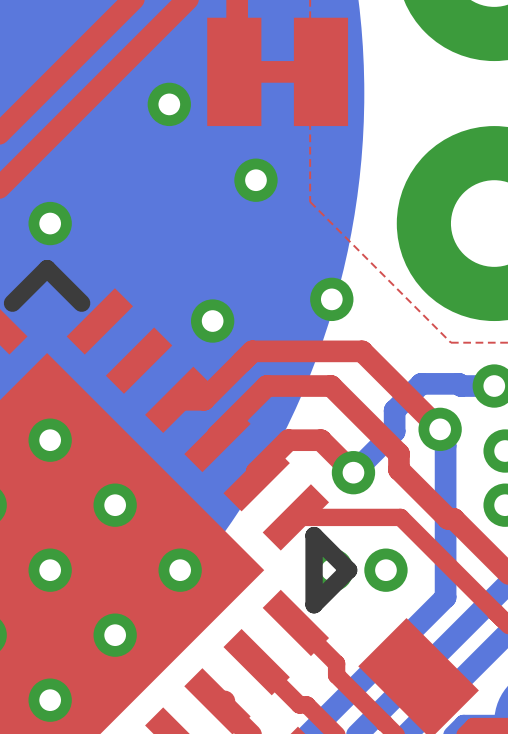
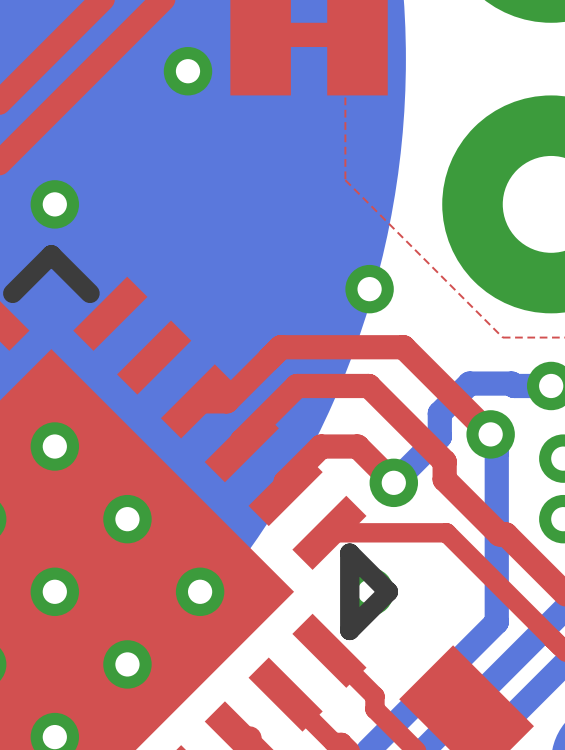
via: (255, 180) -> none
via: (212, 321) -> none
via: (385, 570) -> none

